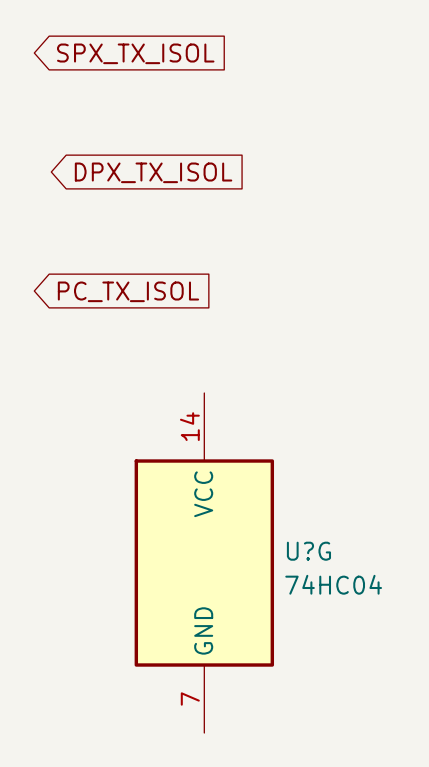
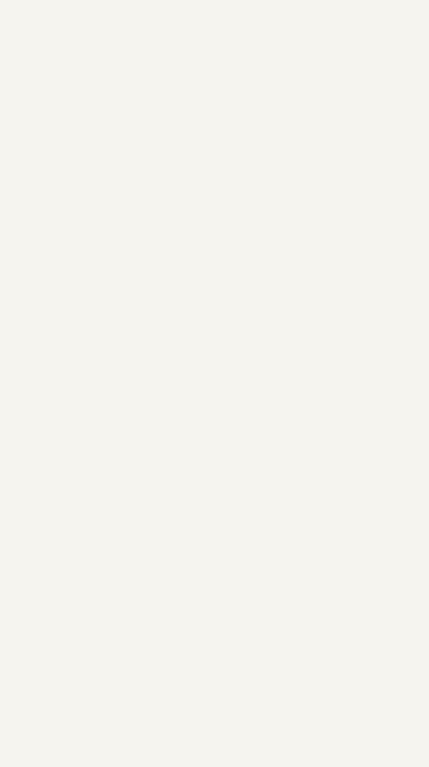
global label: SPX_TX_ISOL (135, 53) -> none
global label: DPX_TX_ISOL (153, 172) -> none
global label: PC_TX_ISOL (128, 291) -> none
U?G: 74HC04 (204, 563) -> none

